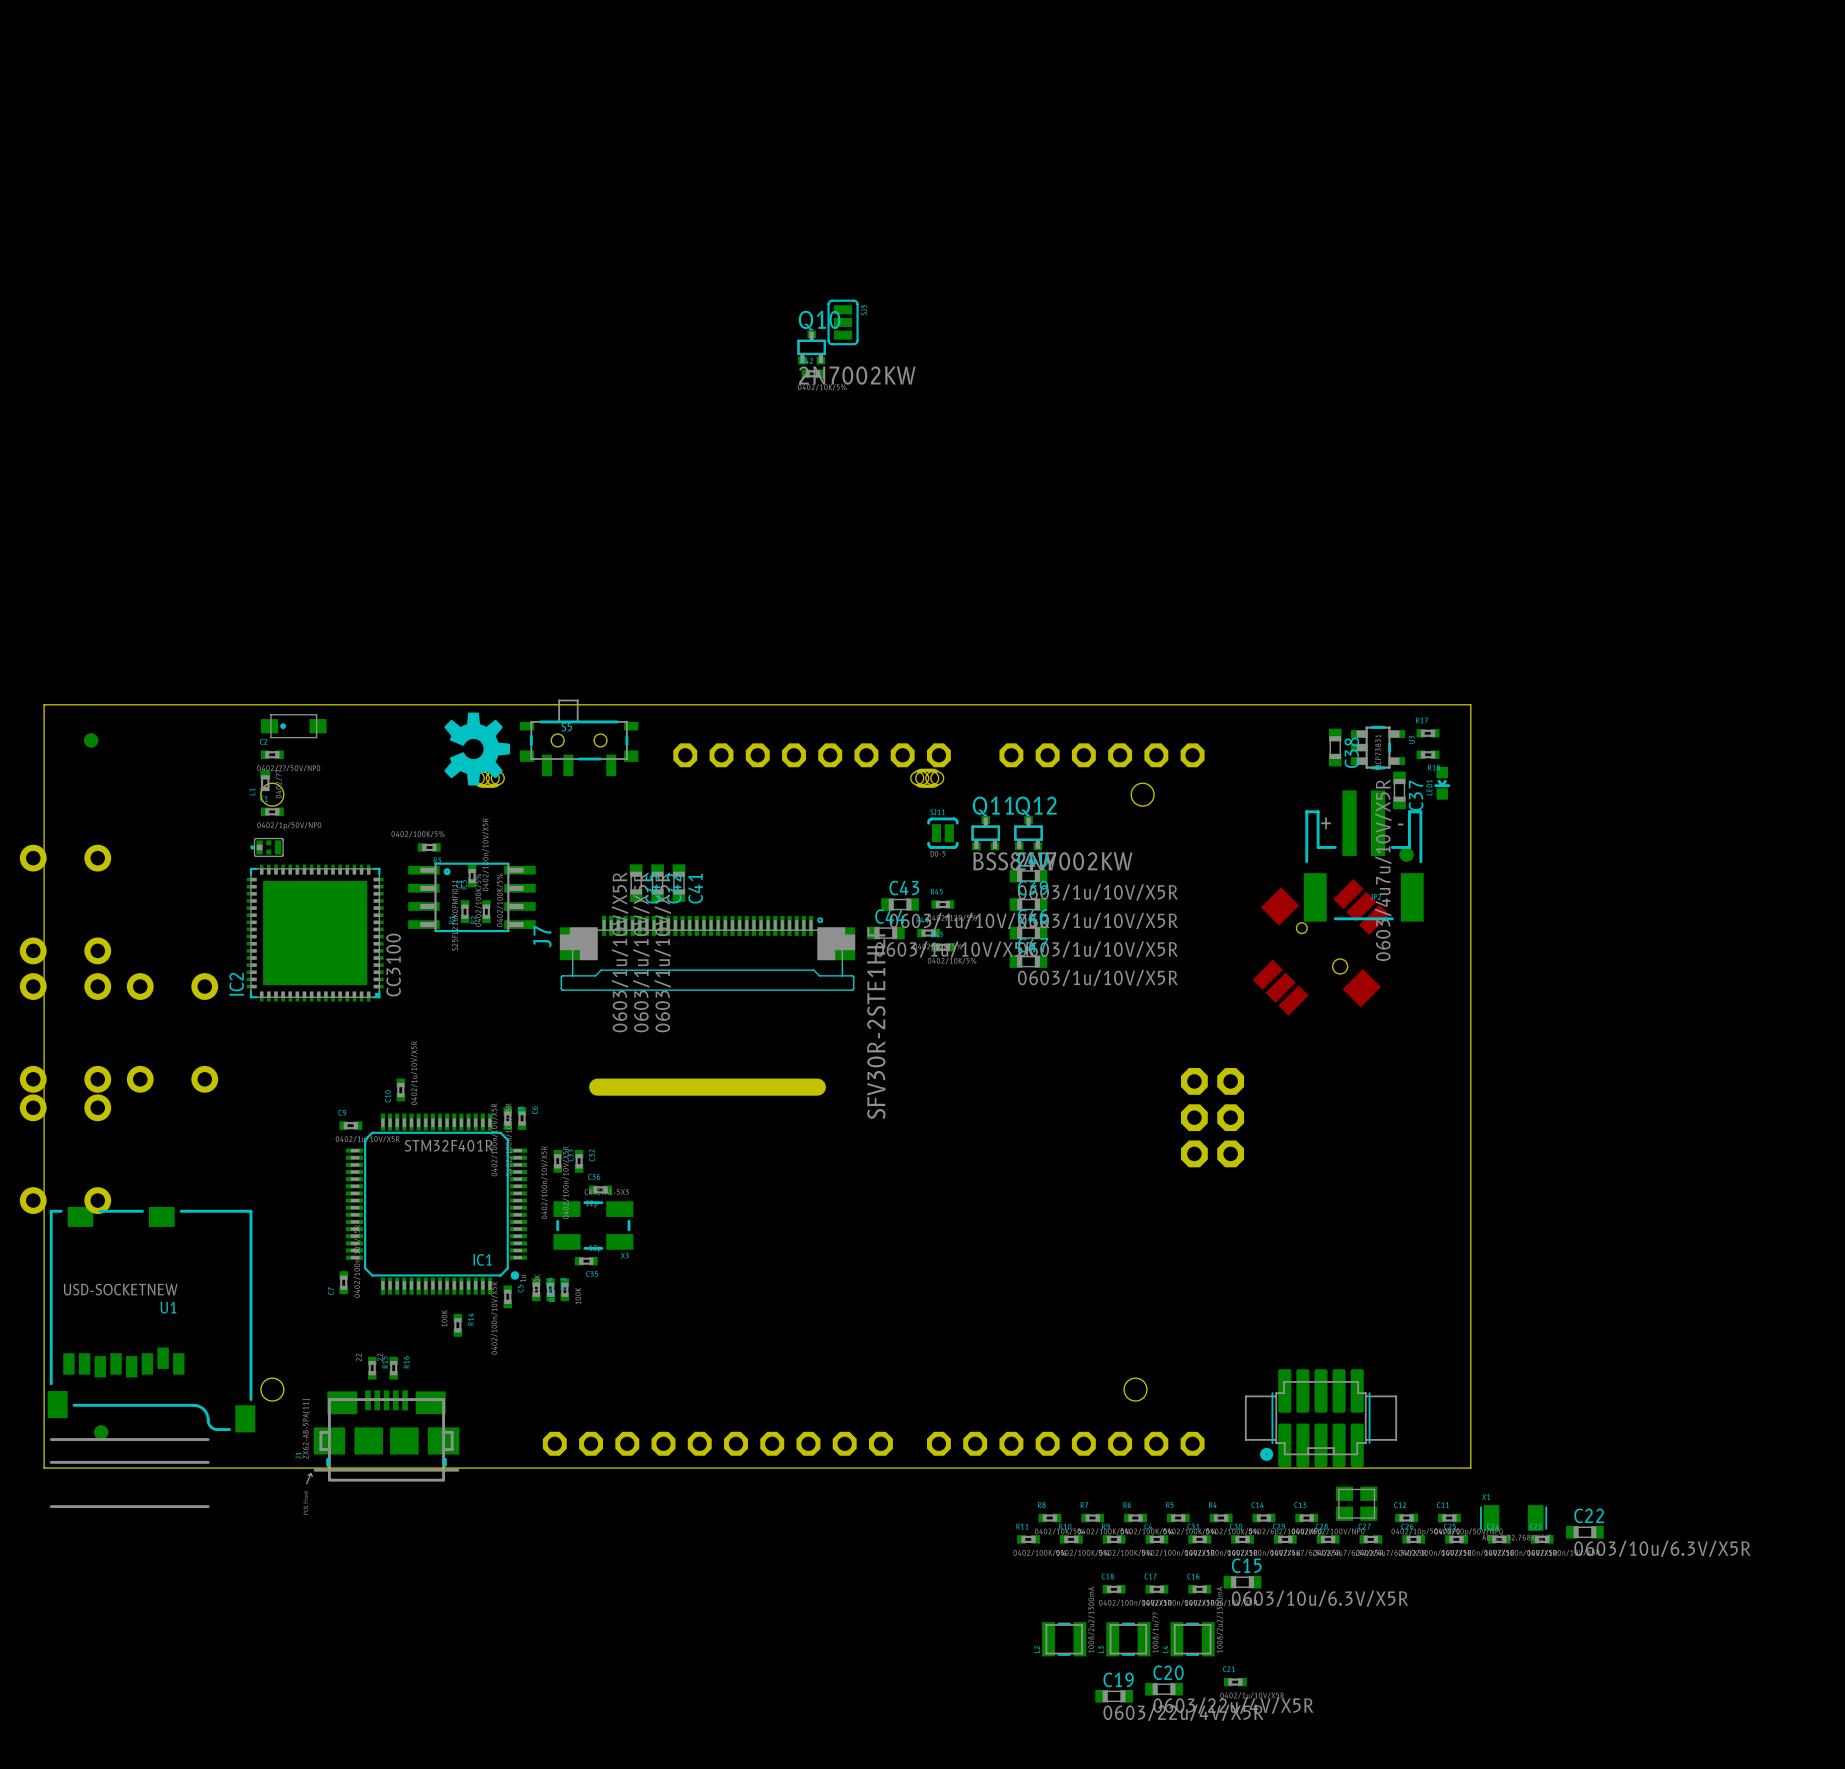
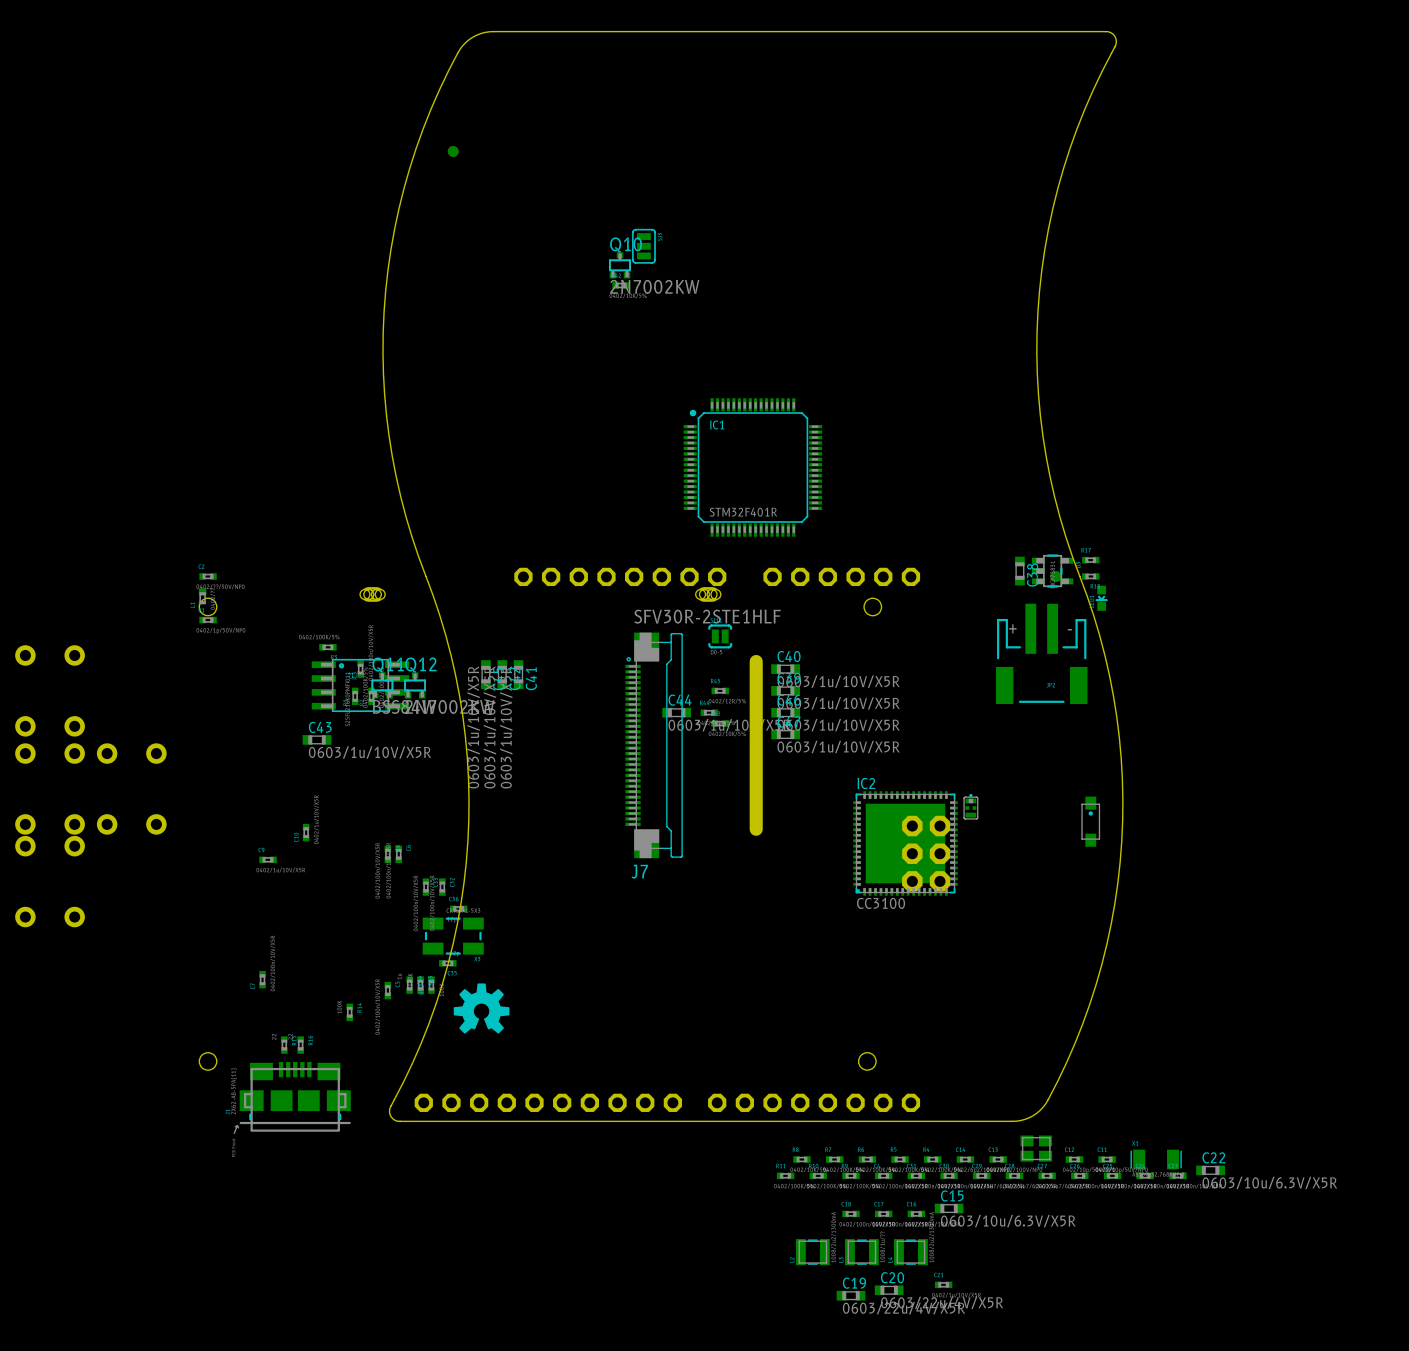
drawing: none -> [382, 30, 1124, 1123]
part: none -> (453, 151)
board edge: (1470, 704) (44, 704) (44, 1468) (1470, 1468) (1470, 704) -> none
drawing: [444, 712, 511, 786] -> none
part: (293, 726) -> none
S5: (579, 737) -> none
part: (91, 740) -> none
C37: 0603/4u7u/10V/X5R (1399, 790) -> none
Q11 position: (985, 833) -> (382, 685)
Q12 position: (1028, 833) -> (415, 685)
part: (266, 847) -> none
part position: (1406, 854) -> (1055, 576)
board edge: none -> (756, 661) (756, 829)
C43 position: (900, 904) -> (317, 739)
IC2 rotation: 0° (315, 933) -> 90° clockwise (905, 843)
IC2 position: (315, 933) -> (905, 843)
part: (1320, 947) -> none
J7 rotation: 0° (707, 953) -> 90° counterclockwise (654, 745)
part: none -> (970, 806)
part: none -> (1090, 821)
board edge: (817, 1087) (597, 1087) -> none
IC1 rotation: 0° (436, 1204) -> 180° (752, 467)
IC1 position: (436, 1204) -> (752, 467)
U1: USD-SOCKETNEW (151, 1357) -> none
part: (1320, 1418) -> none
part: (101, 1432) -> none

